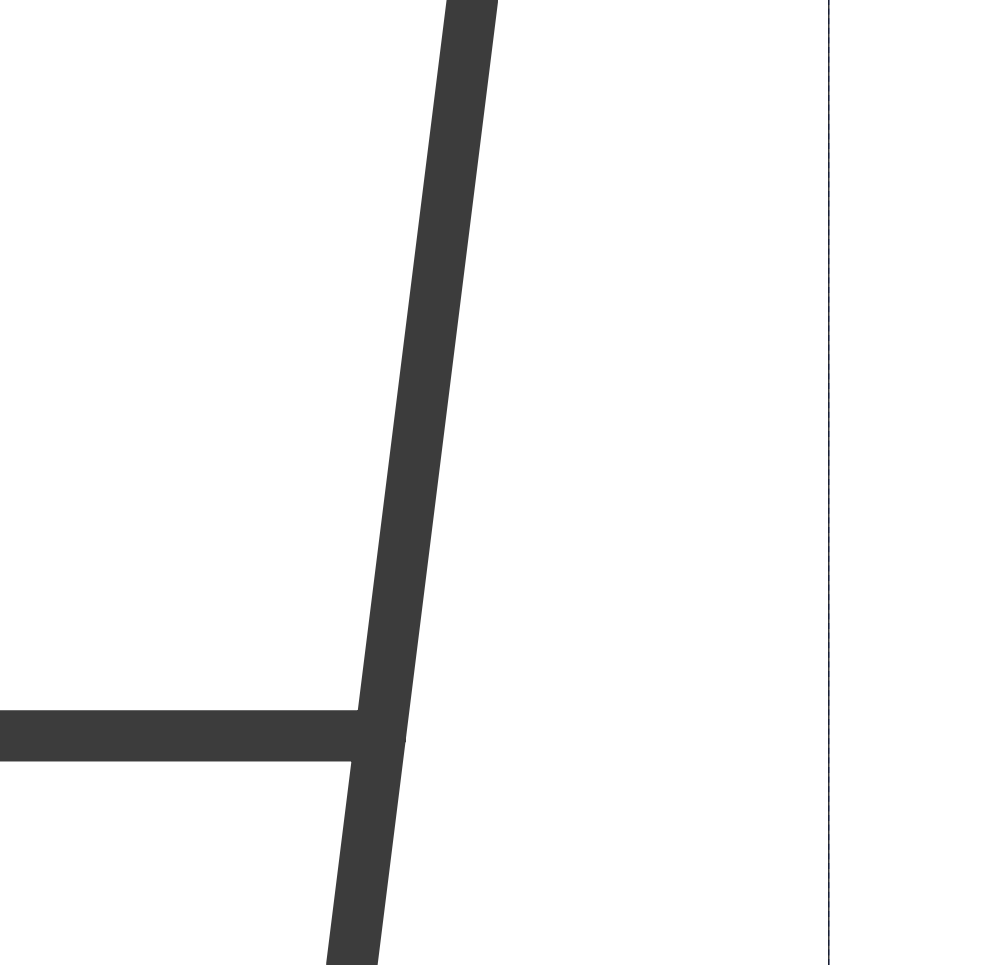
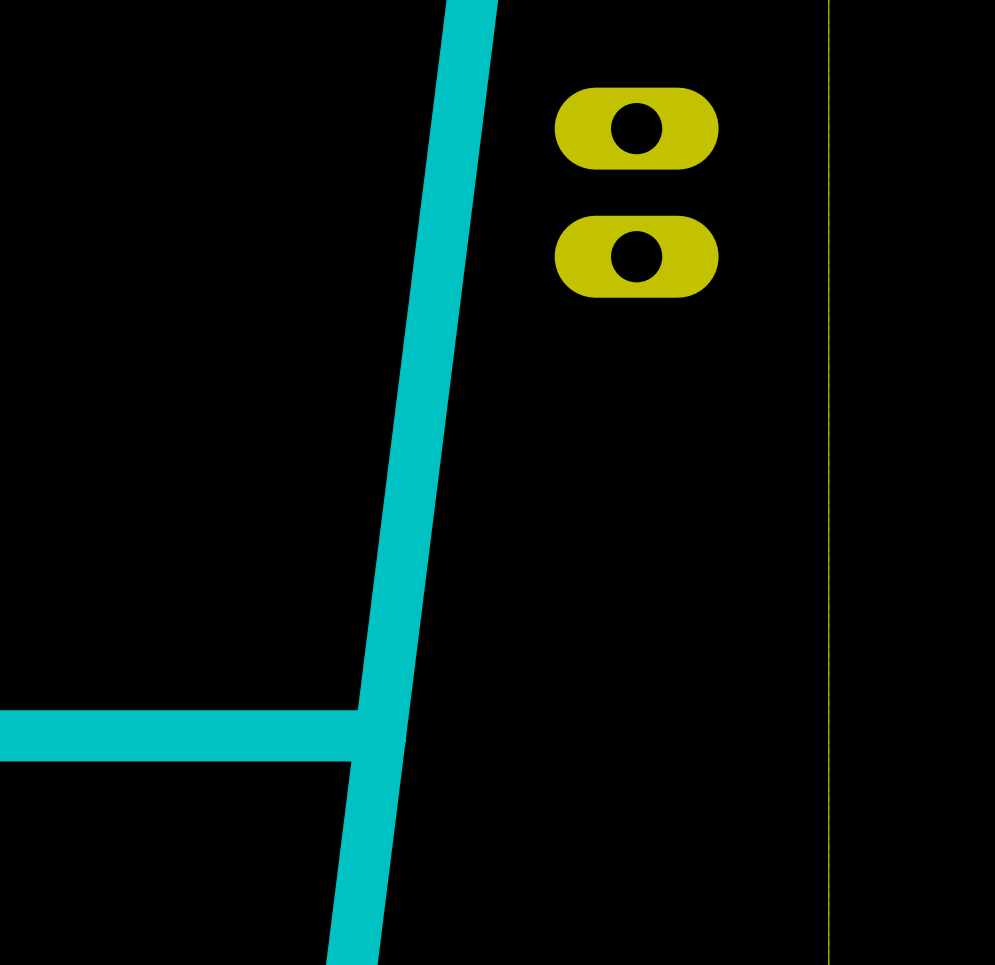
part: none -> (636, 192)

